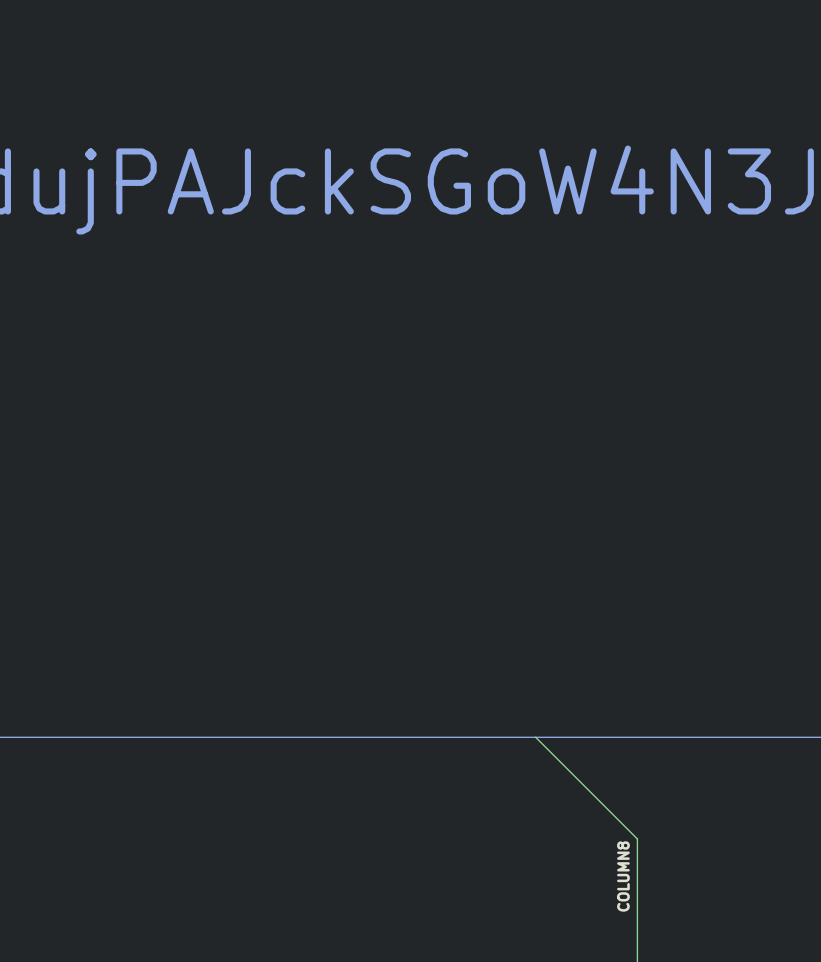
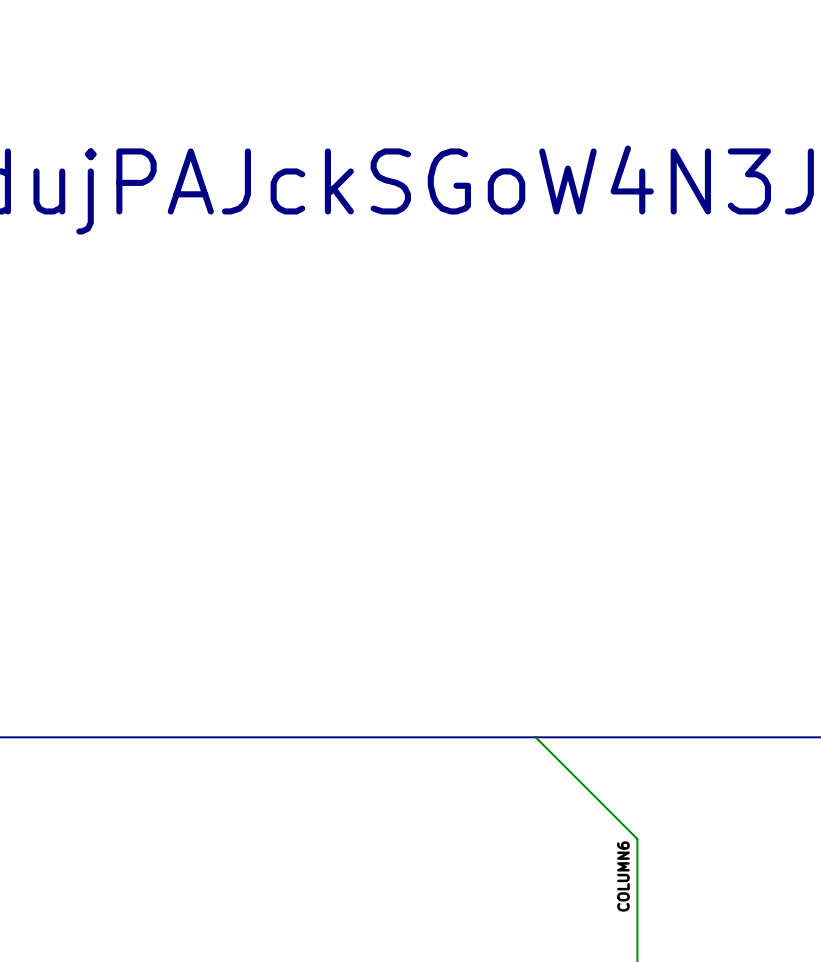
label: COLUMN8 (623, 876) -> COLUMN6 (623, 876)

